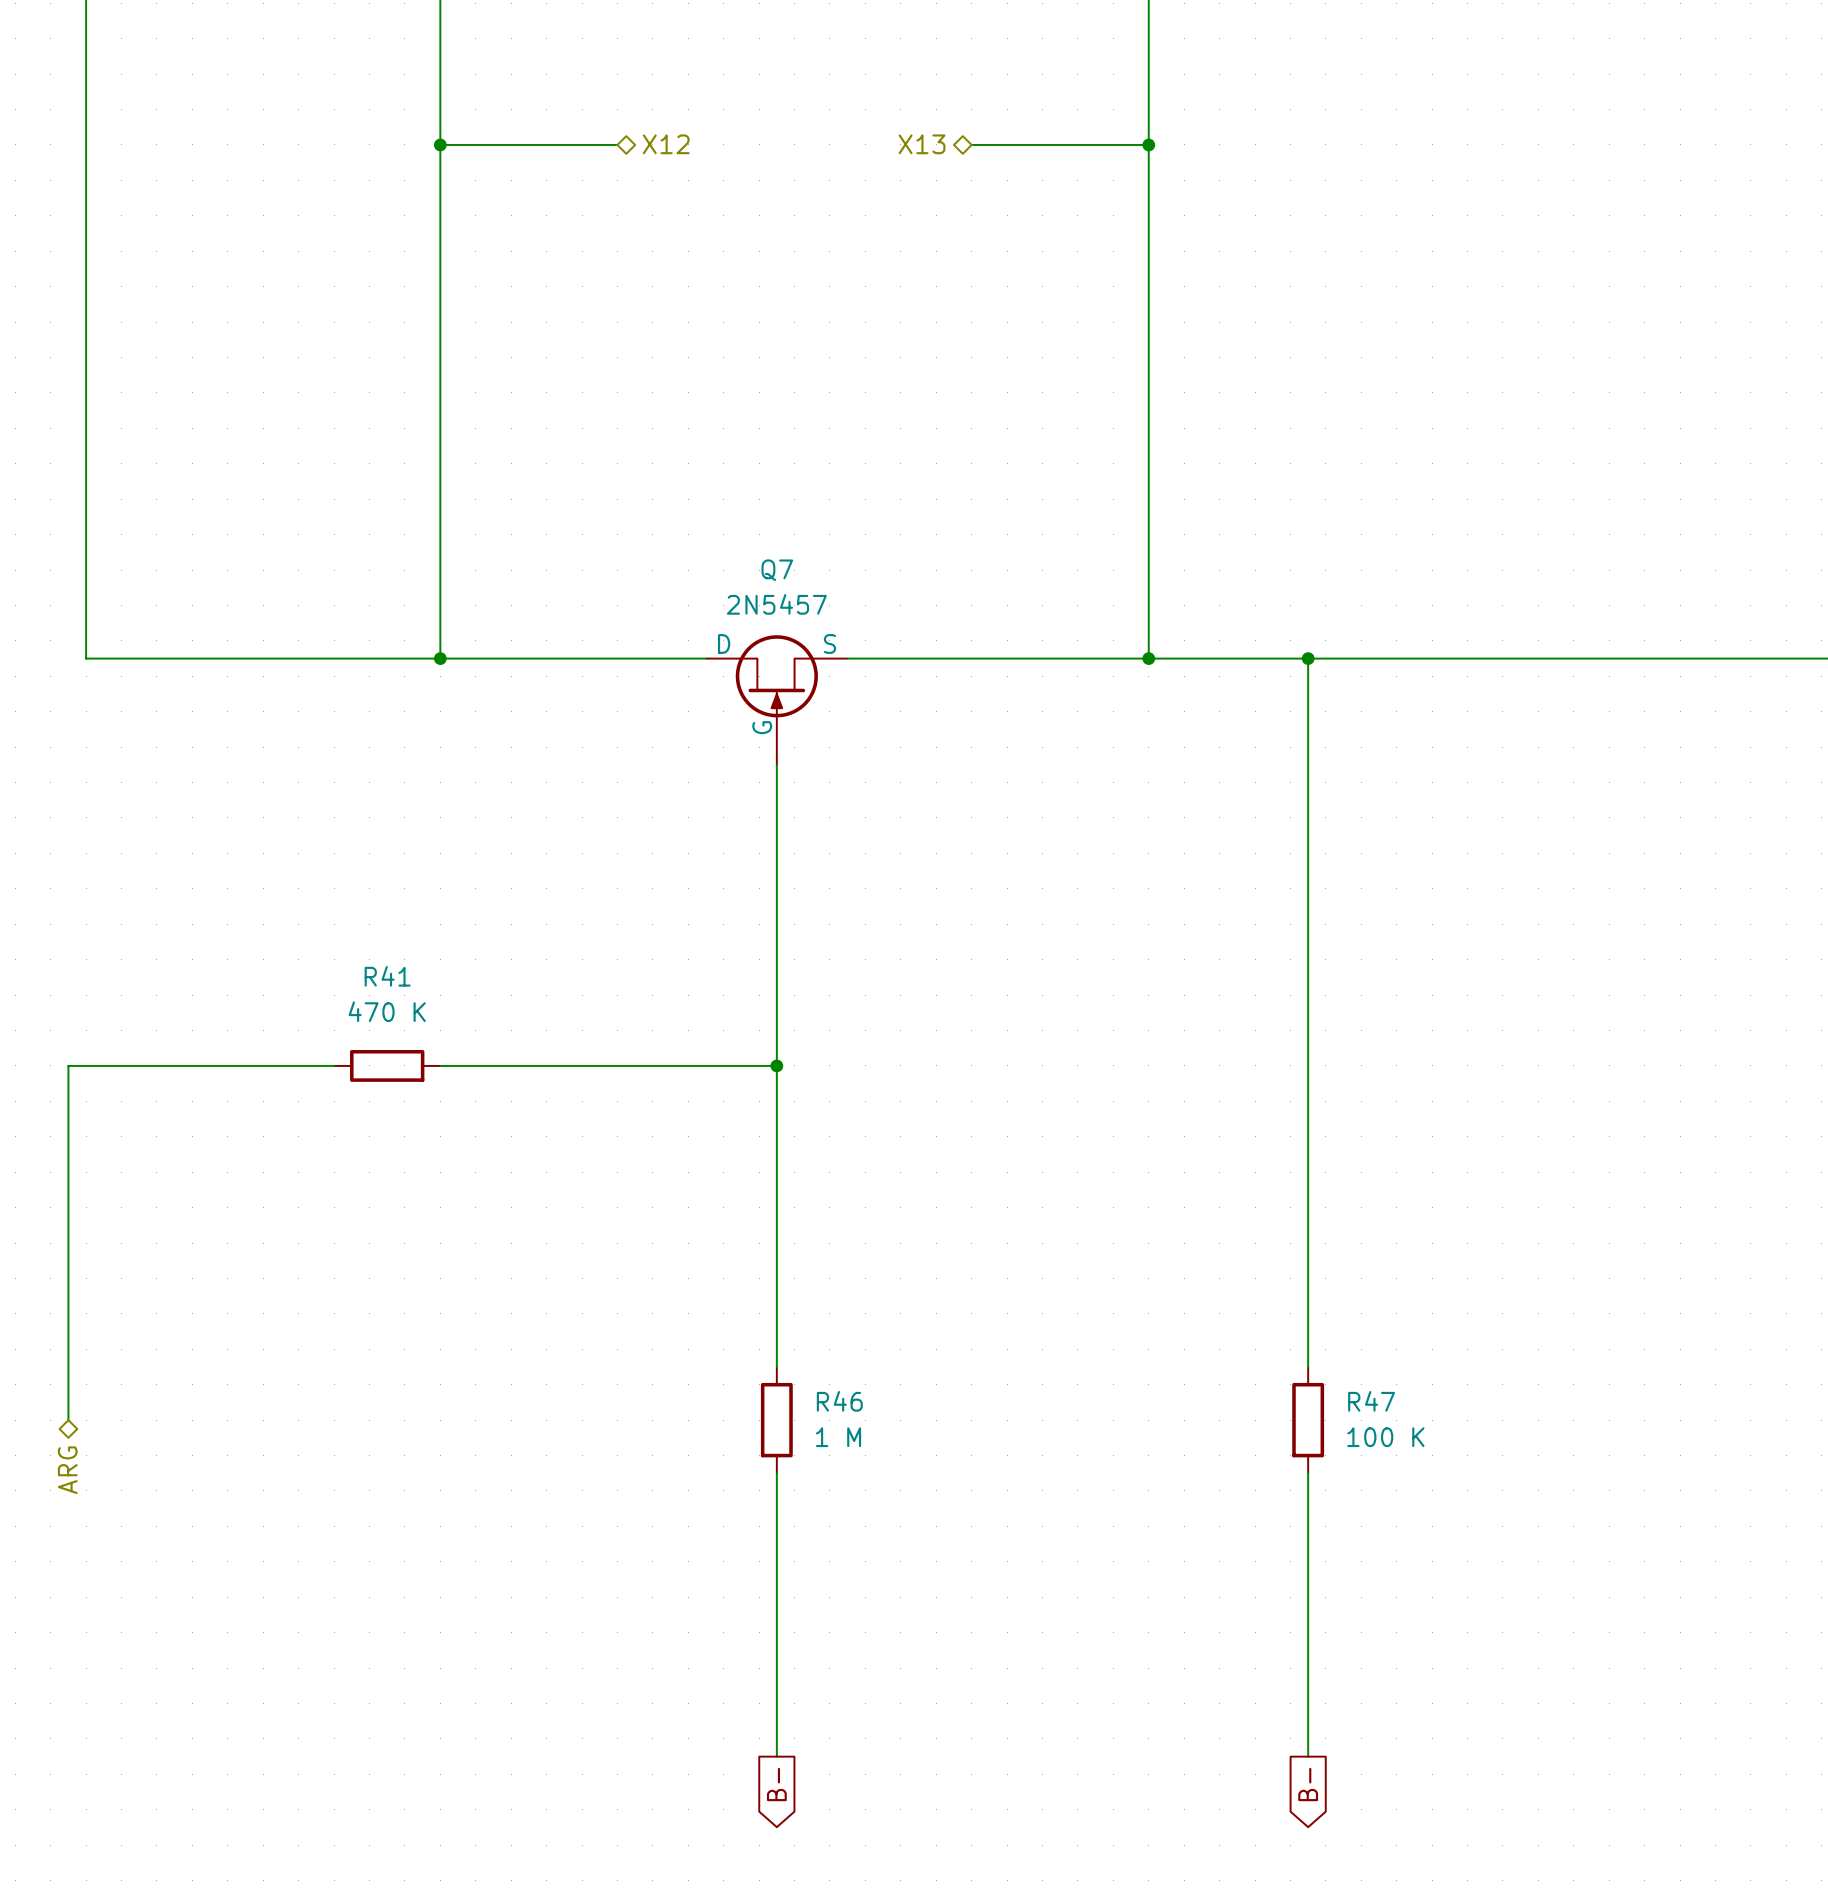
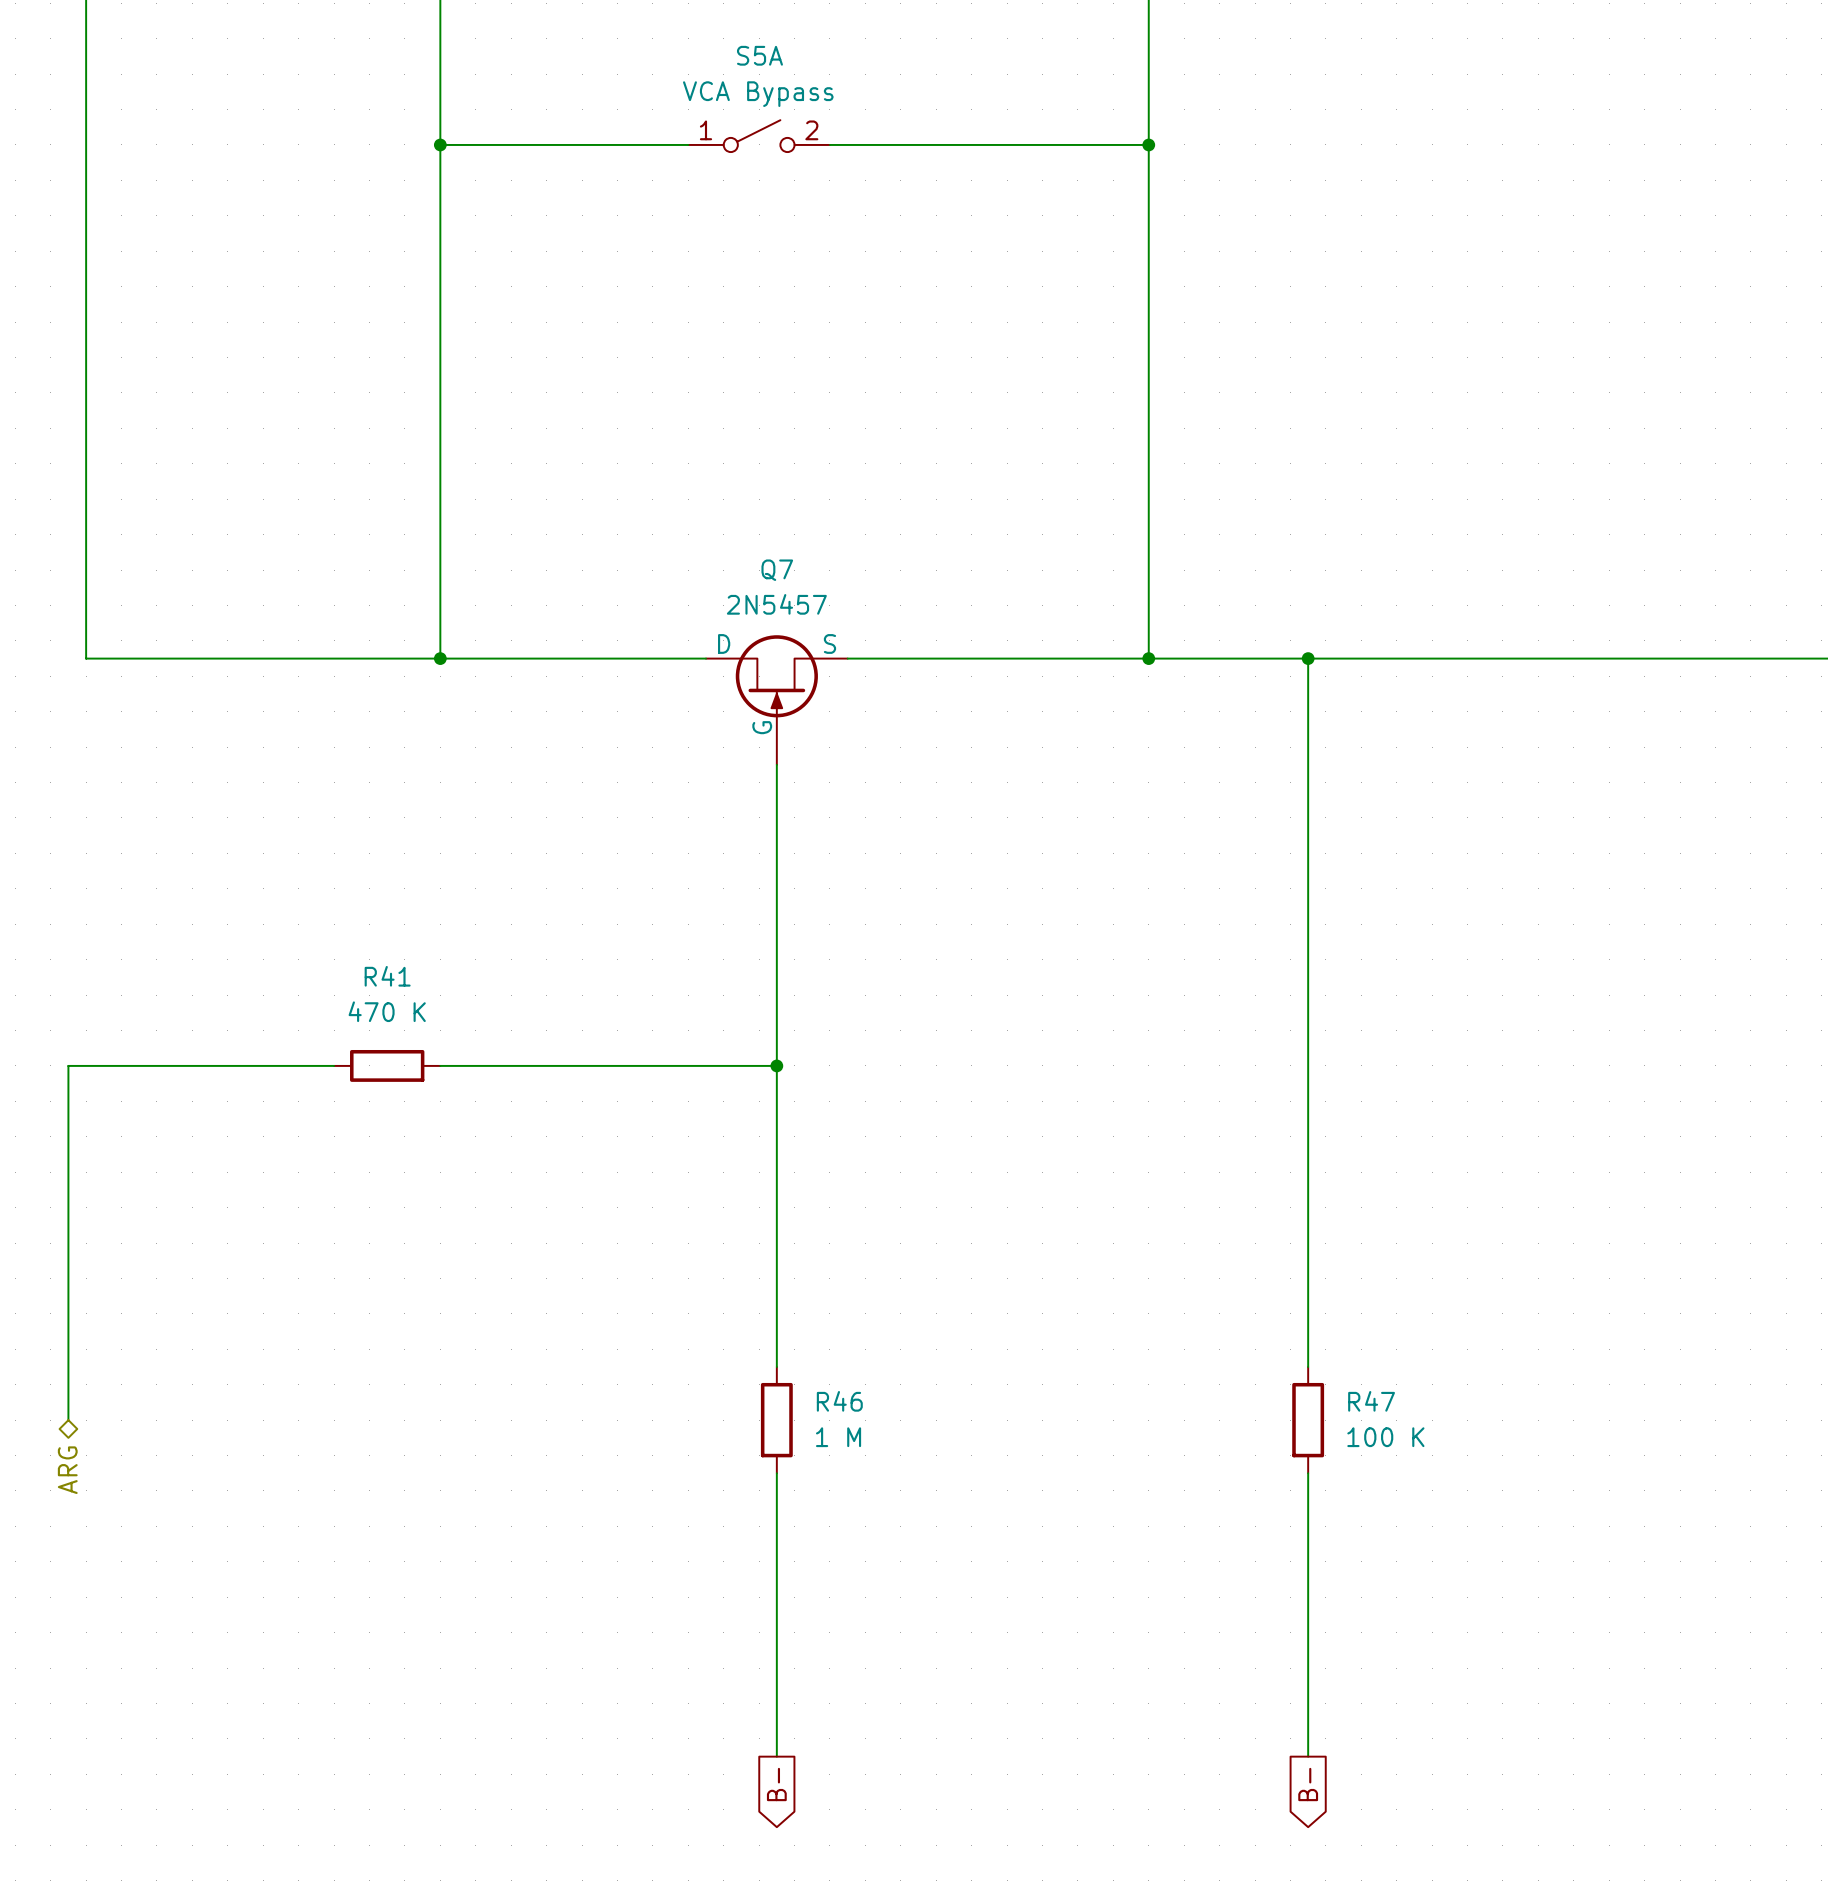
S5A: none -> VCA Bypass (759, 136)
wire: none -> (617, 144) (688, 144)
hierarchical label: X12 (666, 144) -> none
wire: none -> (829, 144) (971, 144)
hierarchical label: X13 (922, 144) -> none

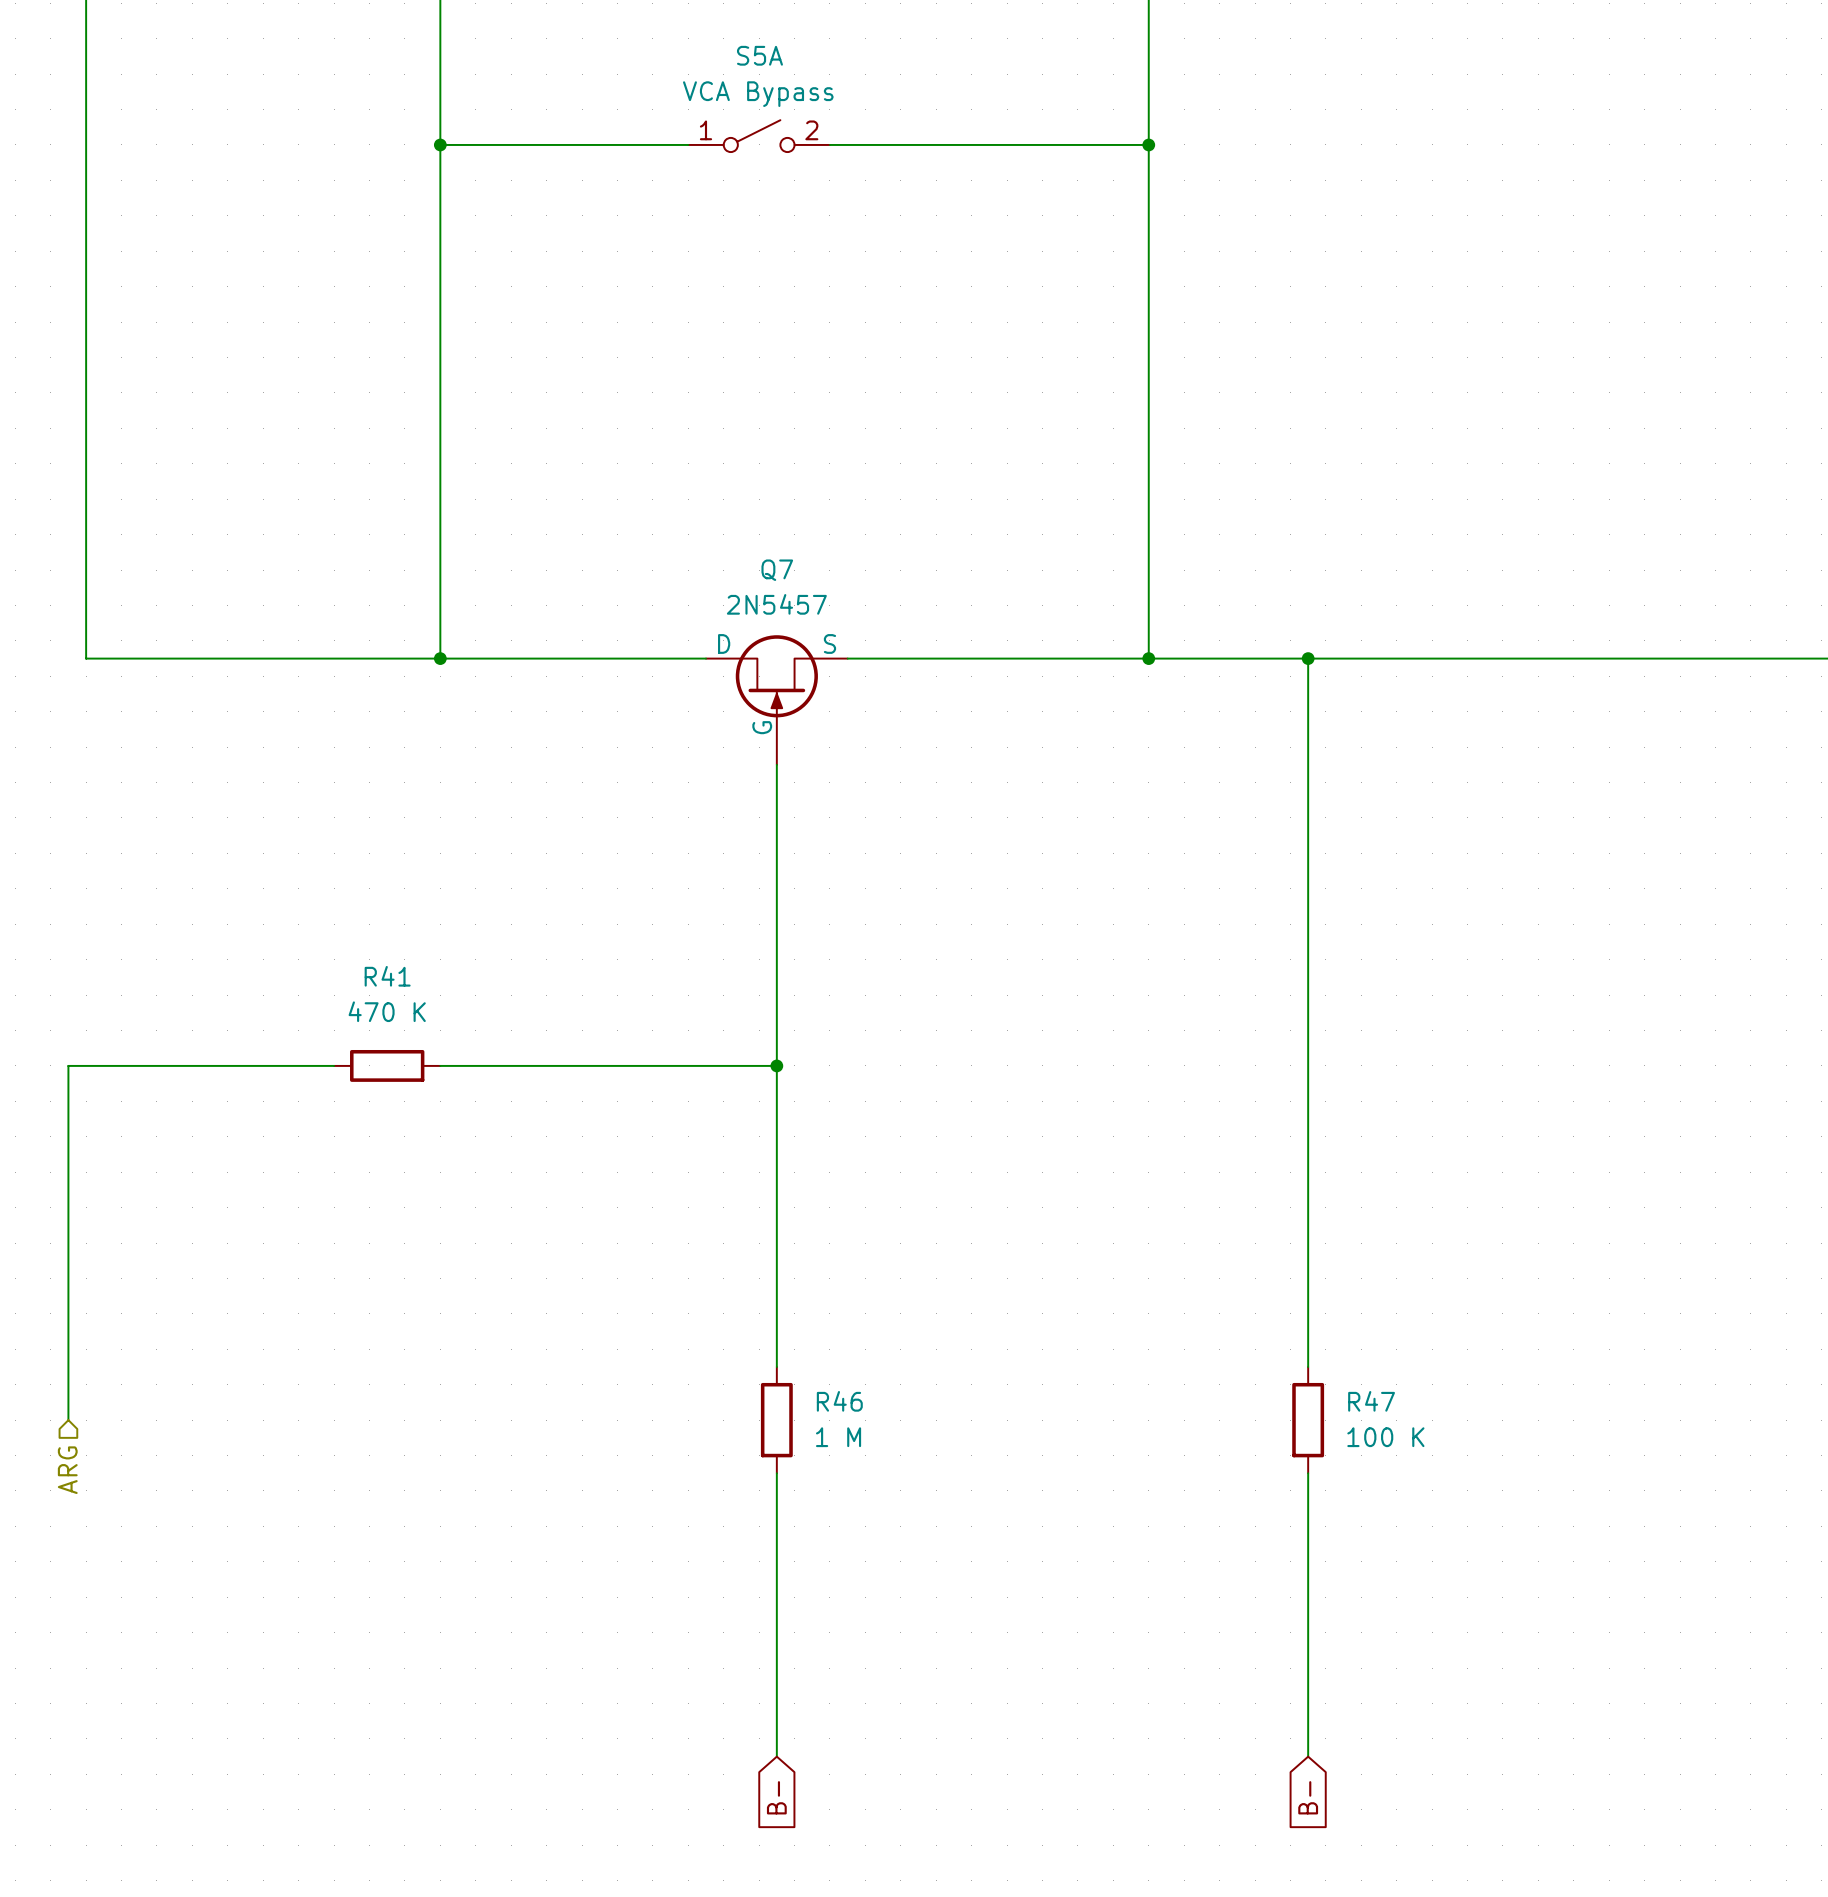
hierarchical label shape: bidirectional (67, 1470) -> input (67, 1470)
global label shape: output (776, 1784) -> input (776, 1797)
global label shape: output (1308, 1784) -> input (1308, 1797)

